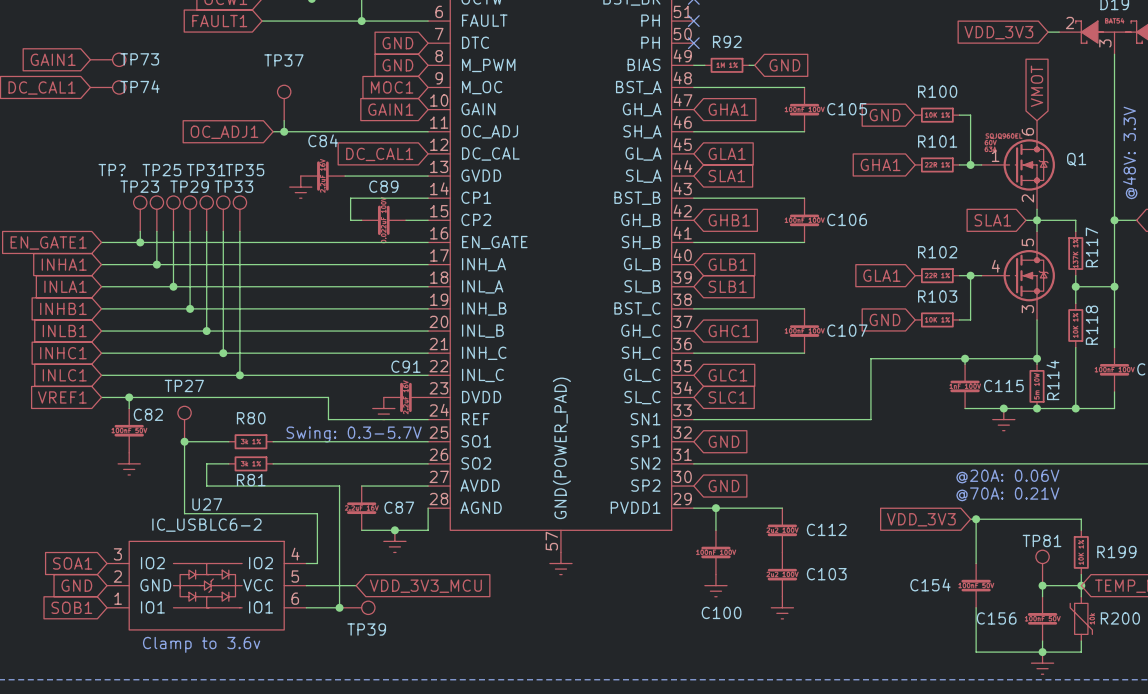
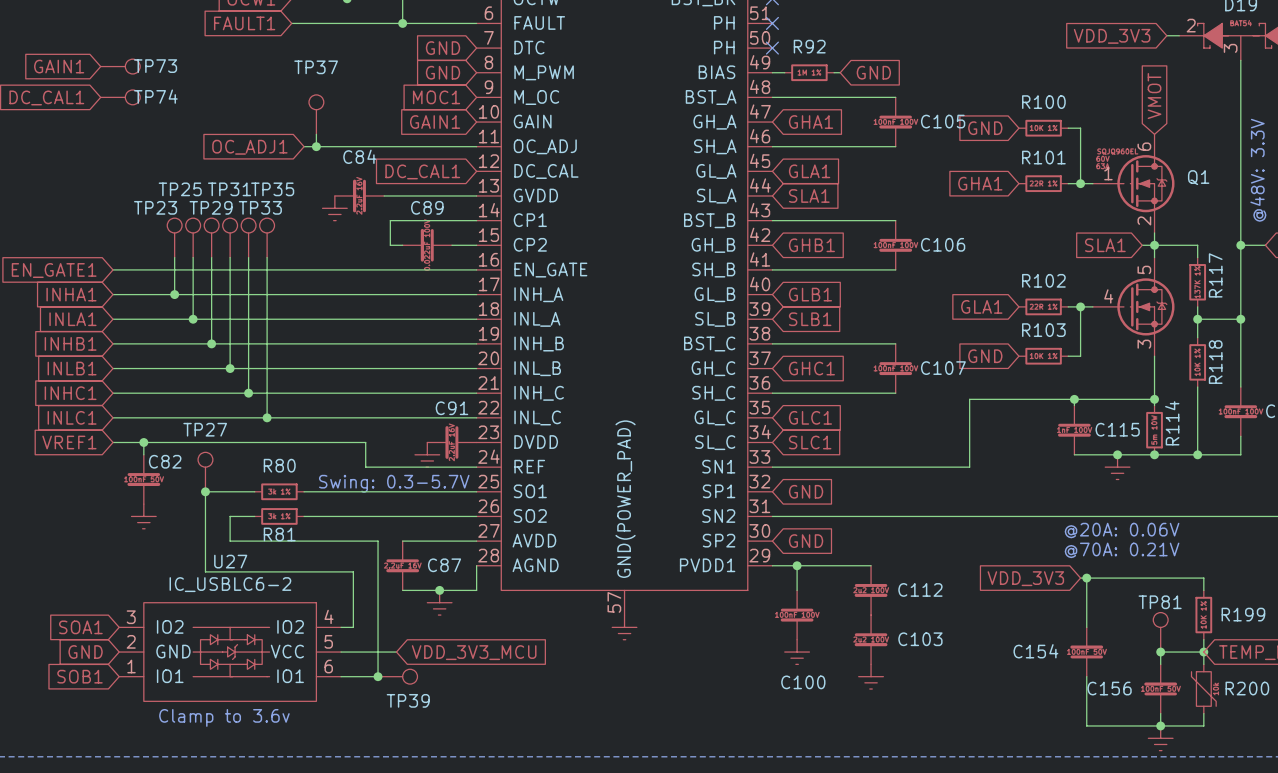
TP?: (140, 213) -> none
wire: (140, 231) (140, 242) -> none
junction: (140, 242) -> none

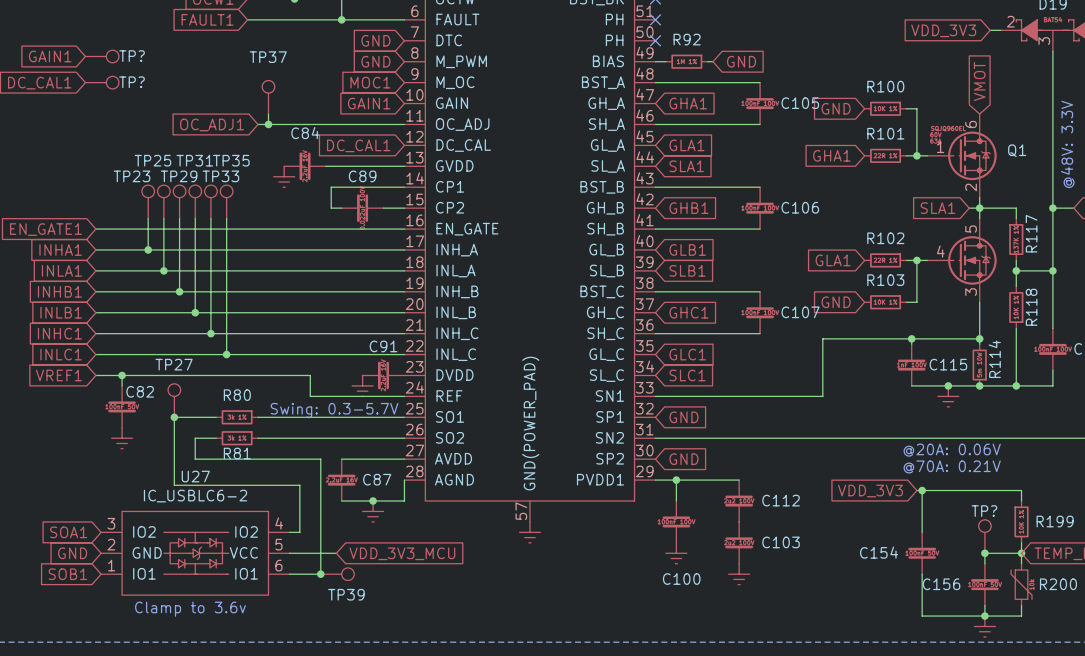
TP73 name: TP73 (155, 66) -> TP? (132, 56)
TP74 name: TP74 (155, 96) -> TP? (132, 82)
TP81 name: TP81 (1160, 602) -> TP? (984, 511)

